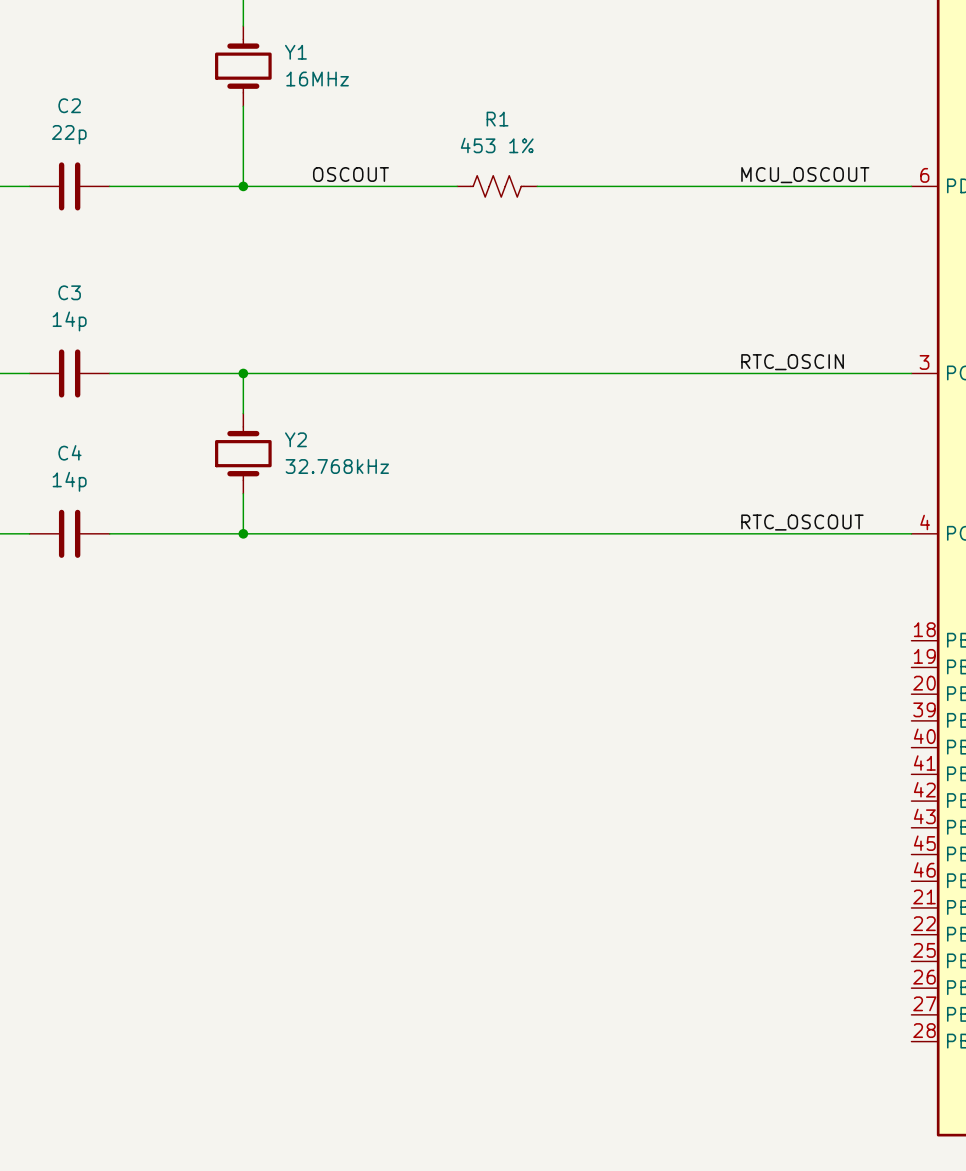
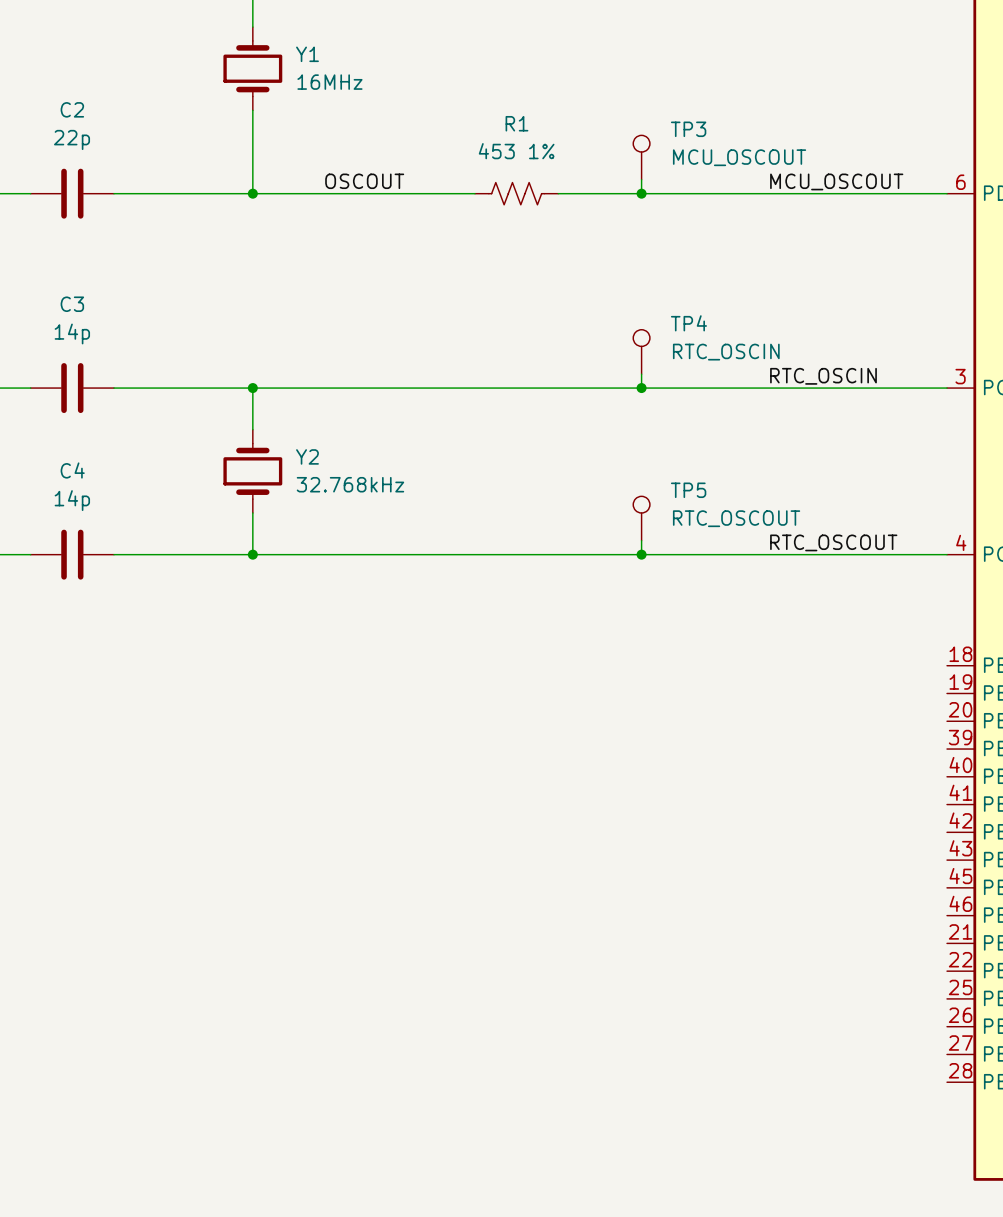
TP3: none -> MCU_OSCOUT (641, 157)
wire: none -> (641, 179) (641, 193)
junction: none -> (641, 193)
TP4: none -> RTC_OSCIN (641, 351)
wire: none -> (641, 374) (641, 388)
junction: none -> (641, 388)
TP5: none -> RTC_OSCOUT (641, 518)
wire: none -> (641, 540) (641, 554)
junction: none -> (641, 554)

